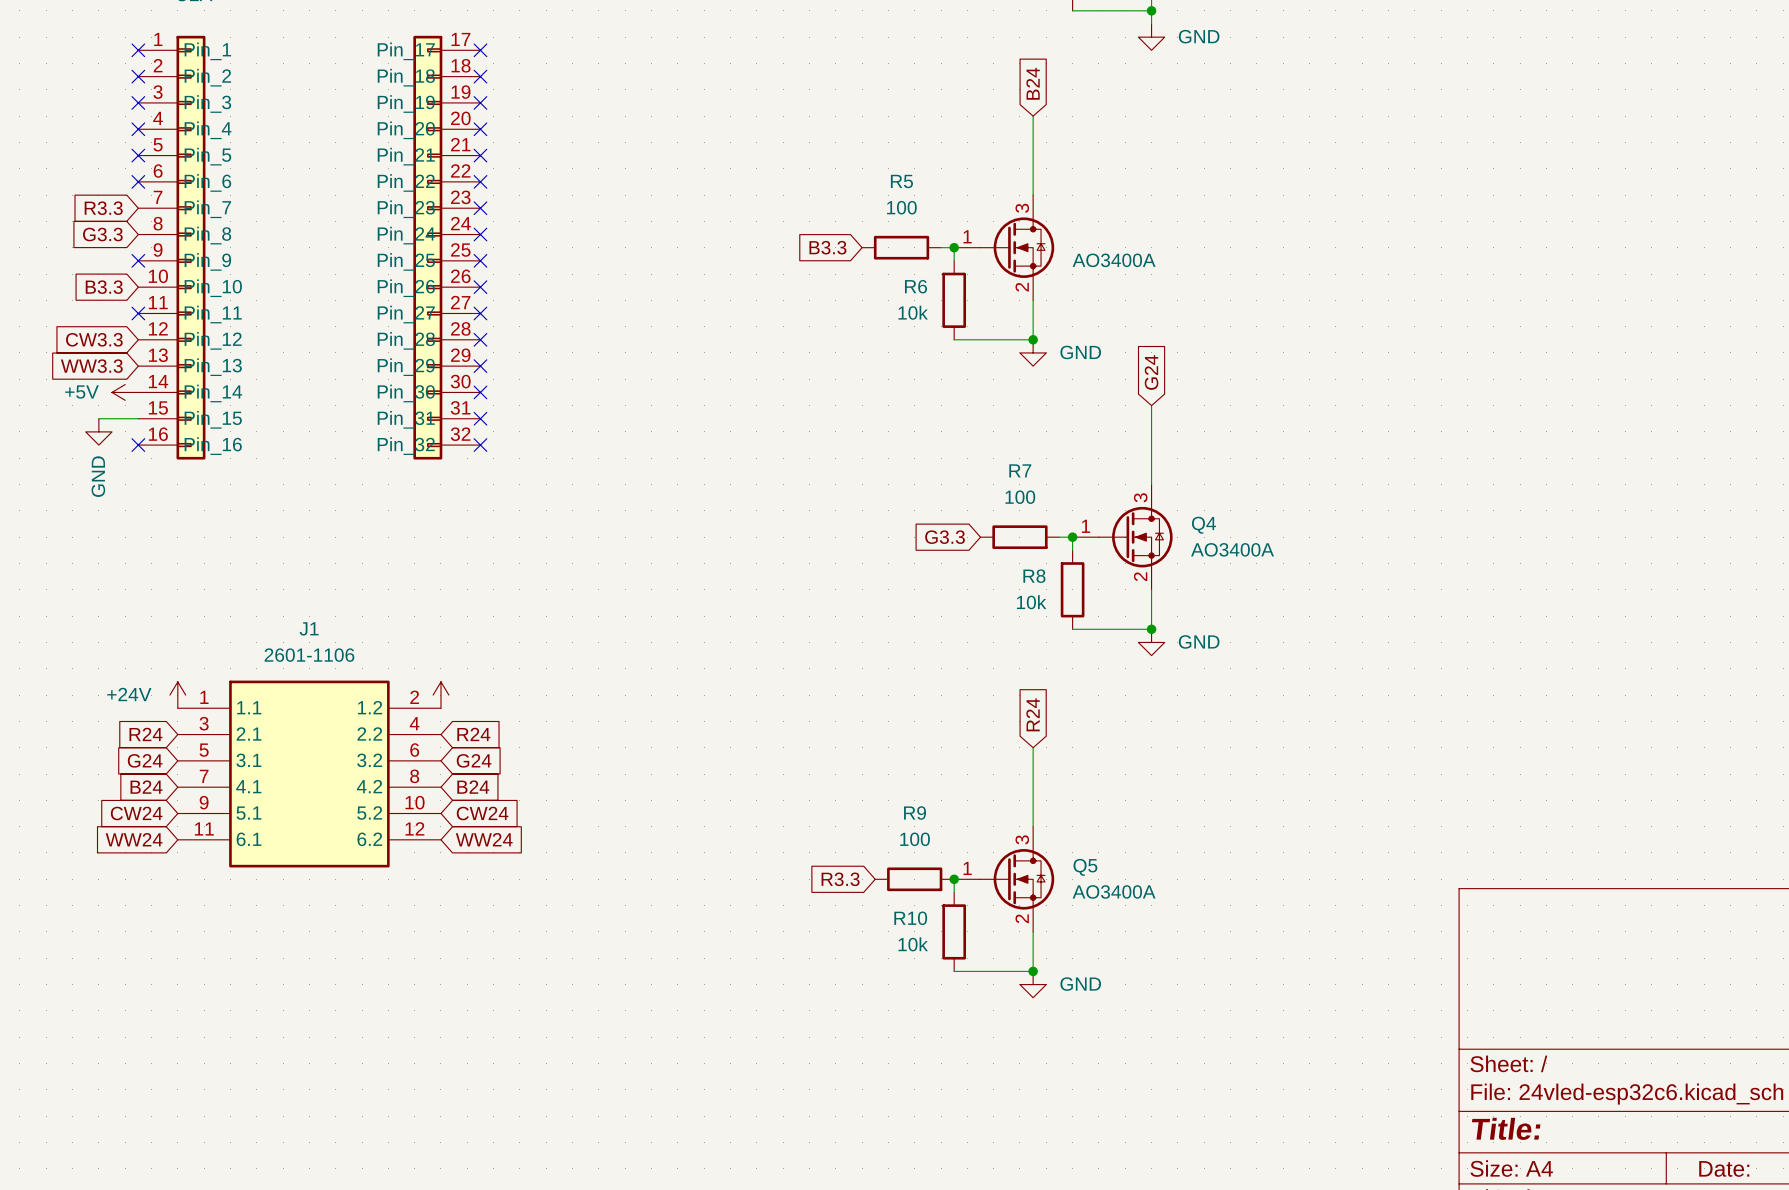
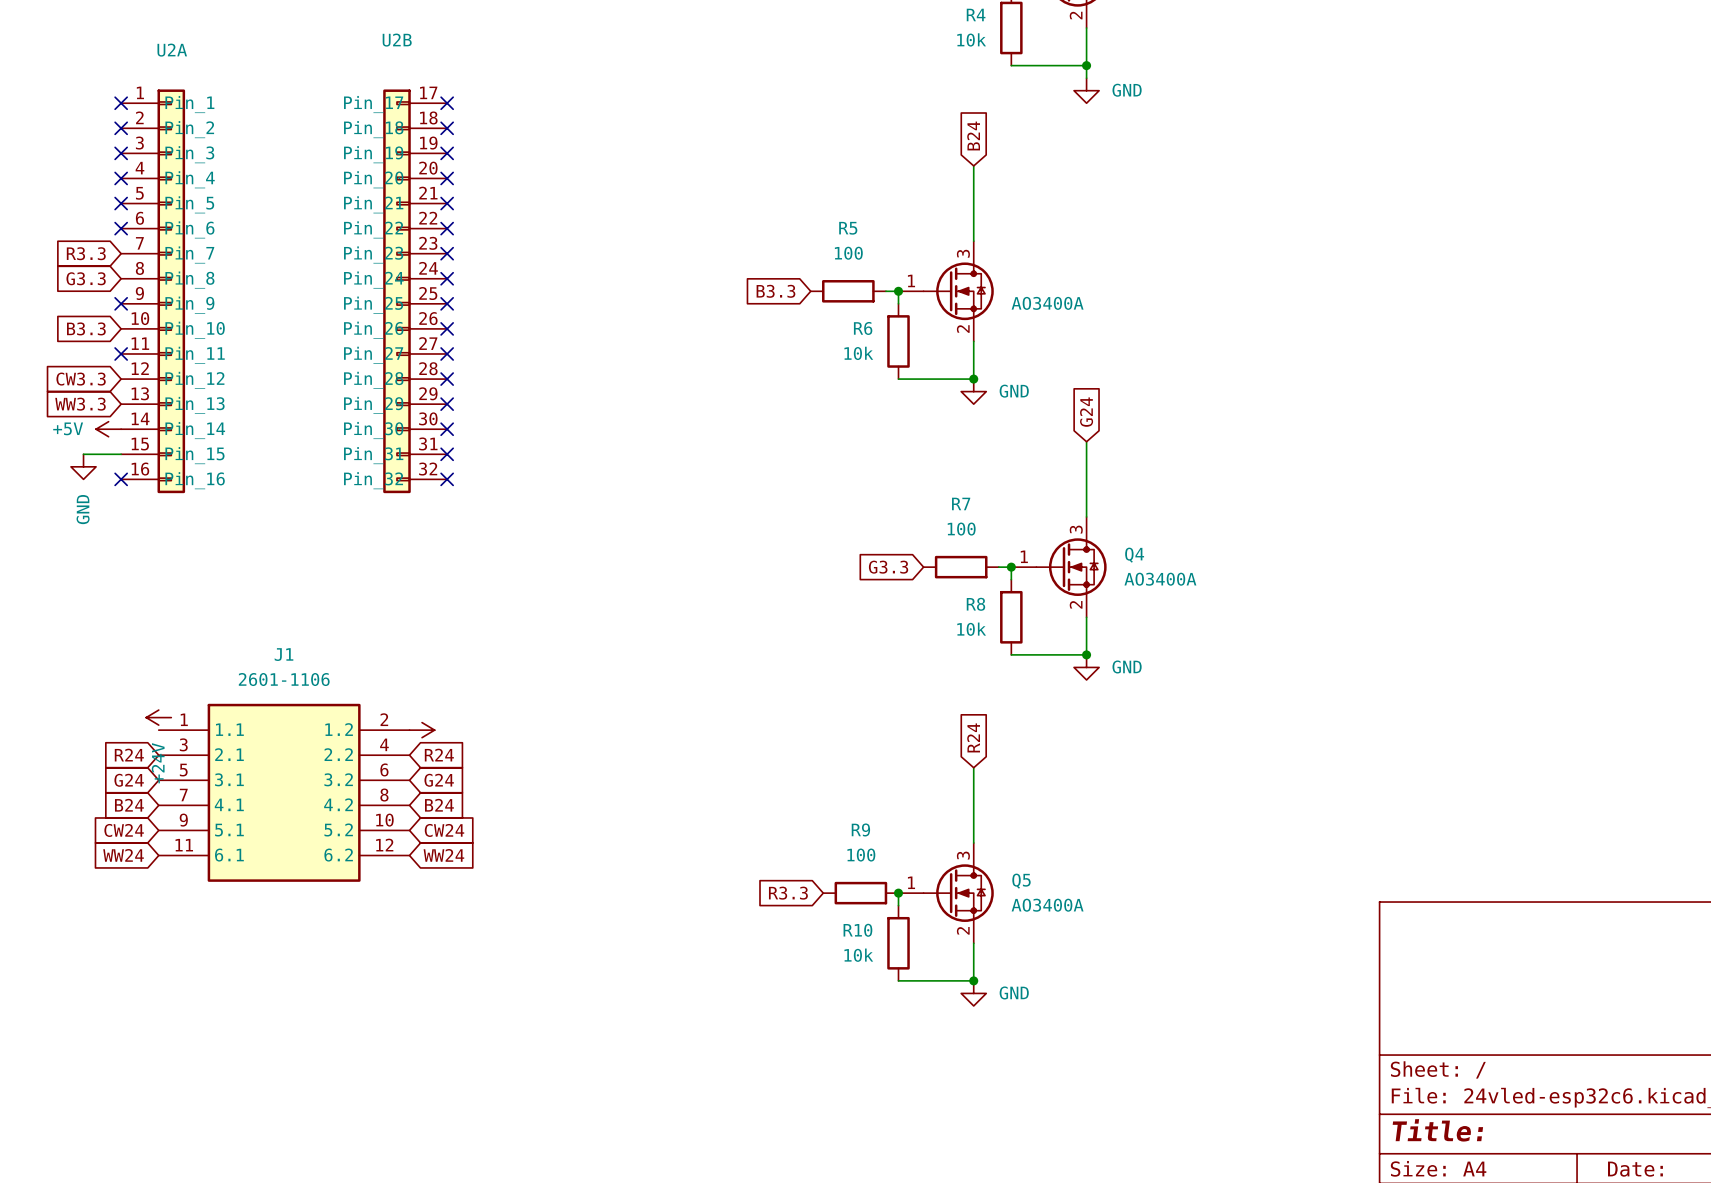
power symbol rotation: 0° (177, 695) -> 90° counterclockwise (158, 717)
power symbol rotation: 0° (440, 695) -> 90° clockwise (422, 730)
power symbol position: (440, 695) -> (422, 730)

